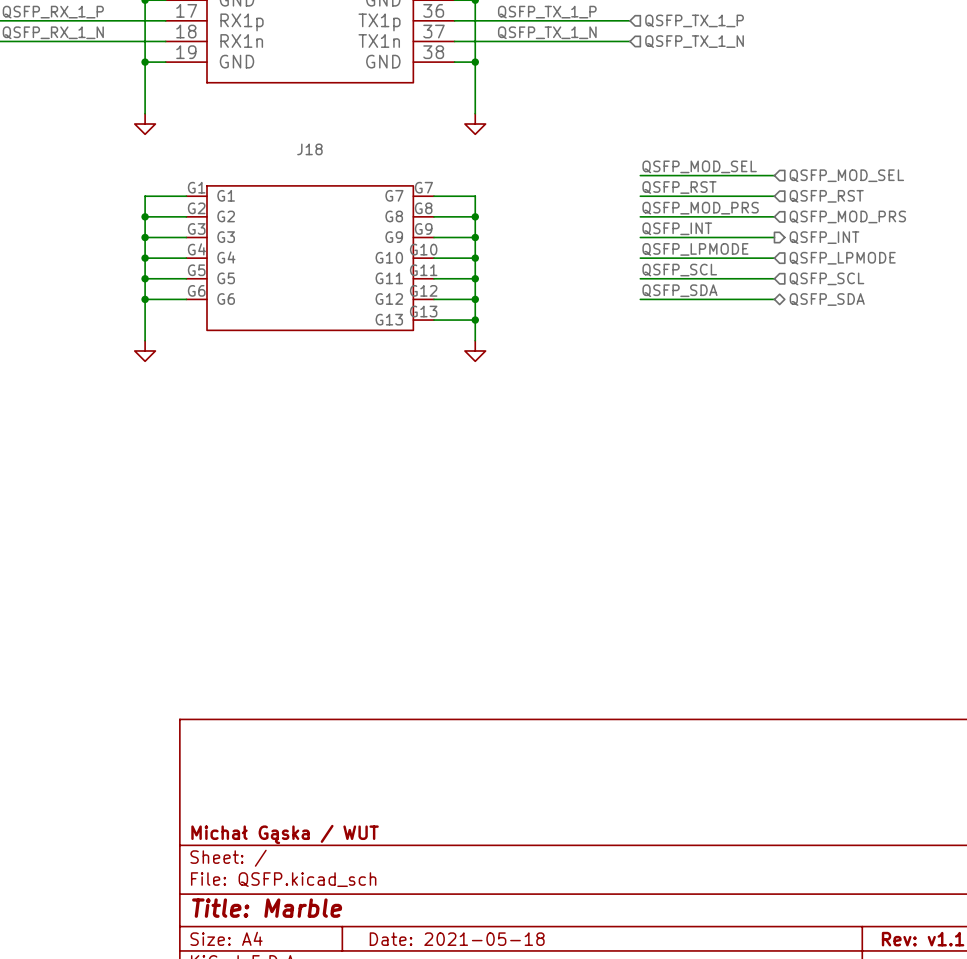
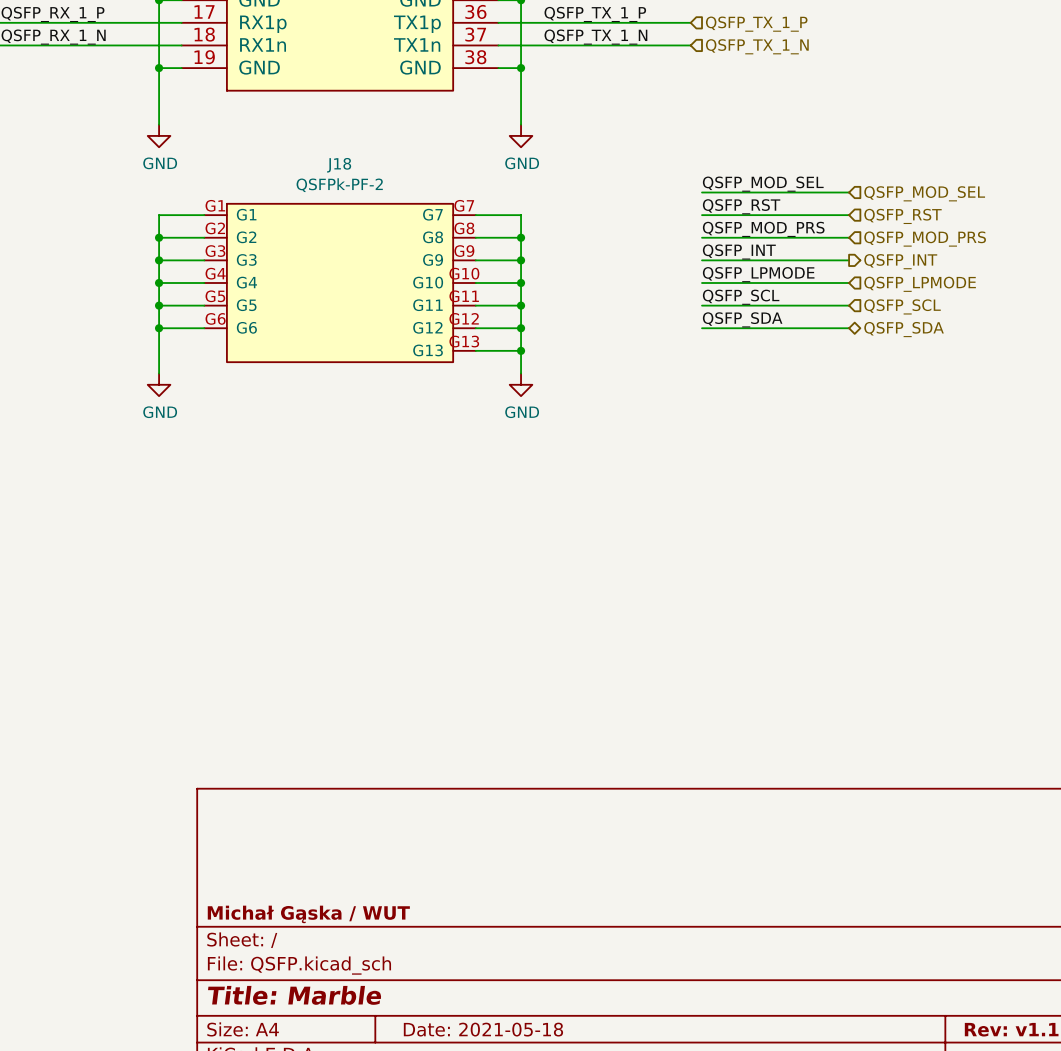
power symbol text: none -> GND (160, 163)
power symbol text: none -> GND (522, 163)
J18 value: none -> QSFPk-PF-2 (339, 185)
power symbol text: none -> GND (160, 412)
power symbol text: none -> GND (522, 412)

